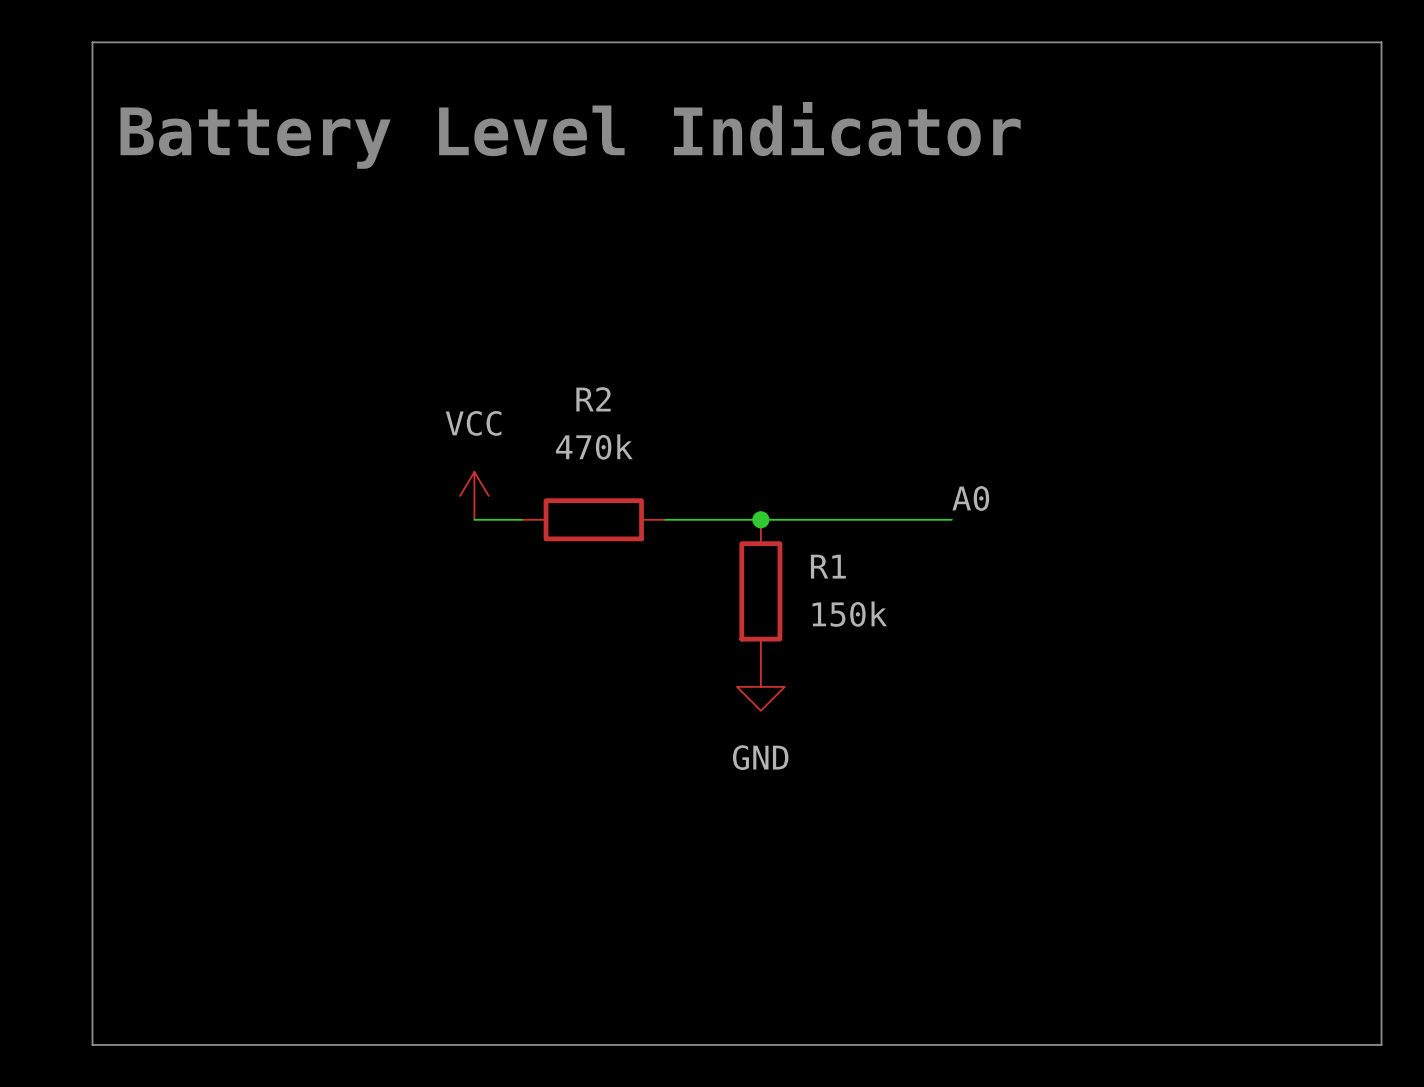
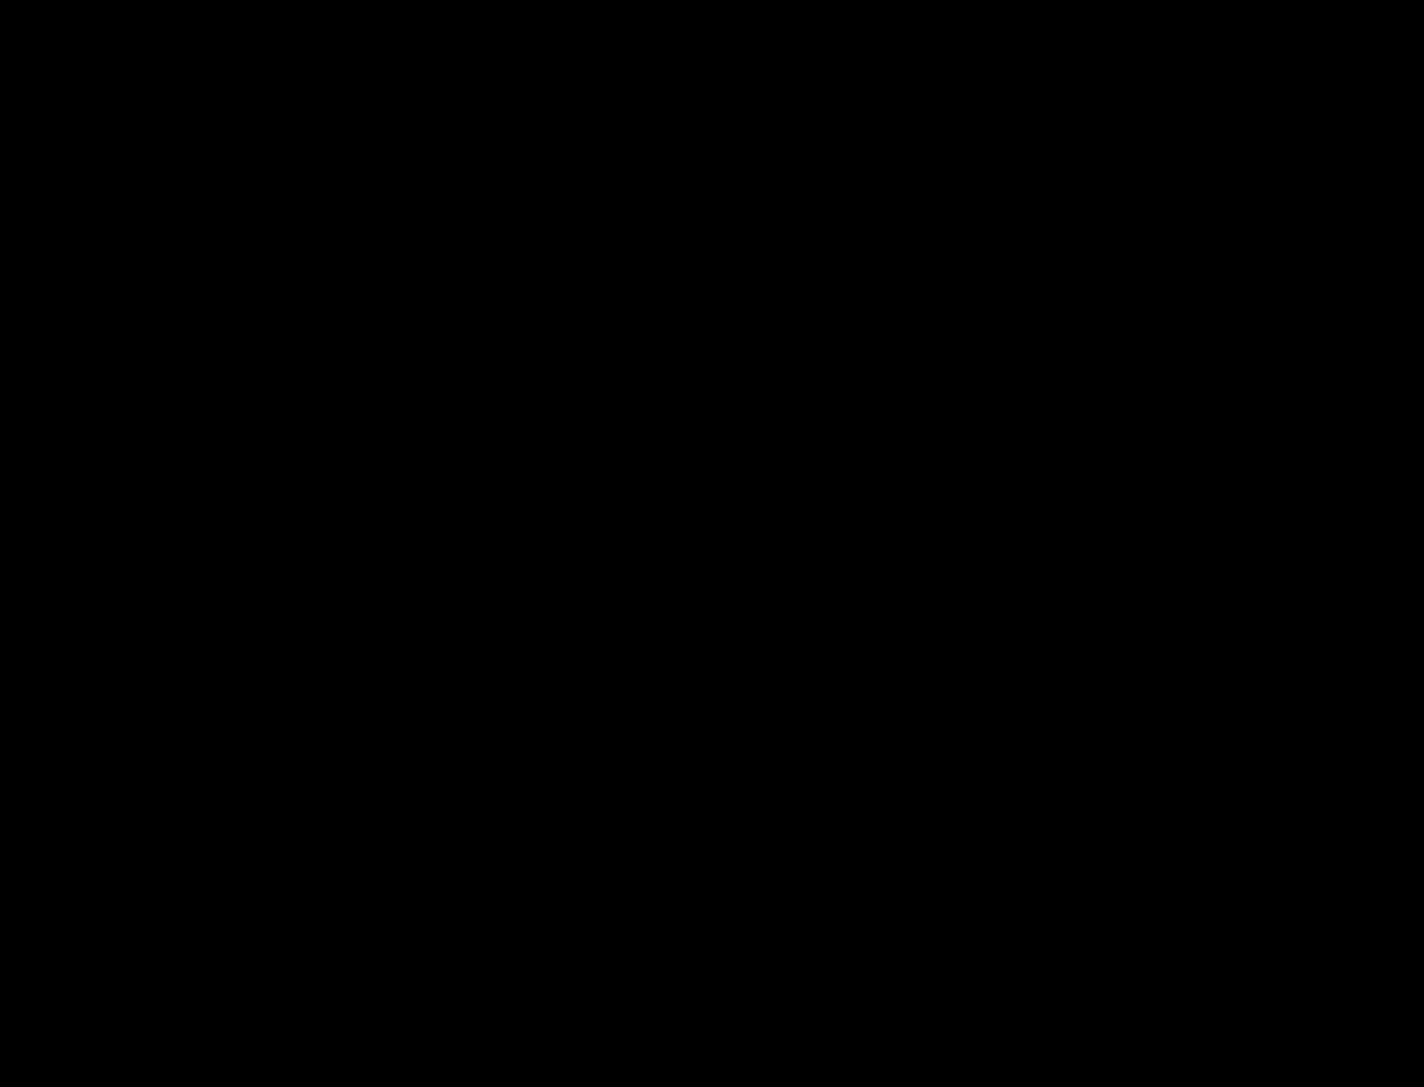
line: (92, 42) (1381, 42) (1381, 1044) (92, 1044) (92, 42) -> none
text: Battery Level Indicator (570, 135) -> none
power symbol: VCC (474, 495) -> none
label: A0 (970, 498) -> none
wire: (474, 519) (522, 519) -> none
R2: 470k (593, 519) -> none
wire: (665, 519) (951, 519) -> none
junction: (760, 519) -> none
R1: 150k (760, 591) -> none
power symbol: GND (760, 686) -> none

